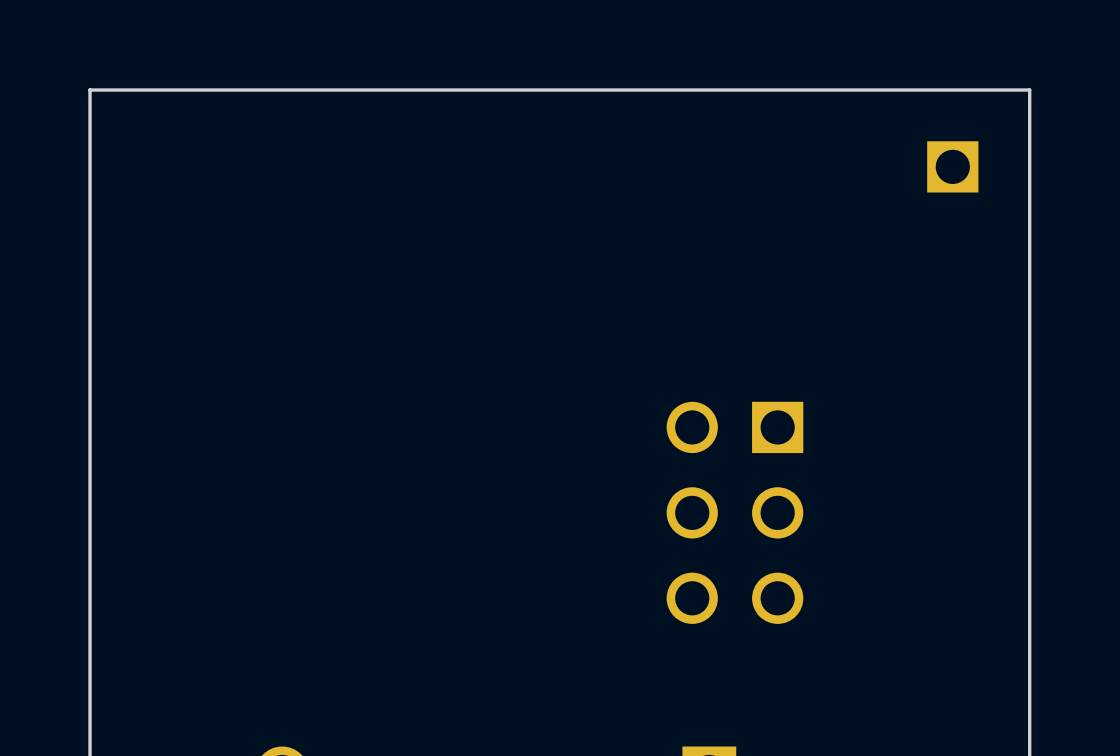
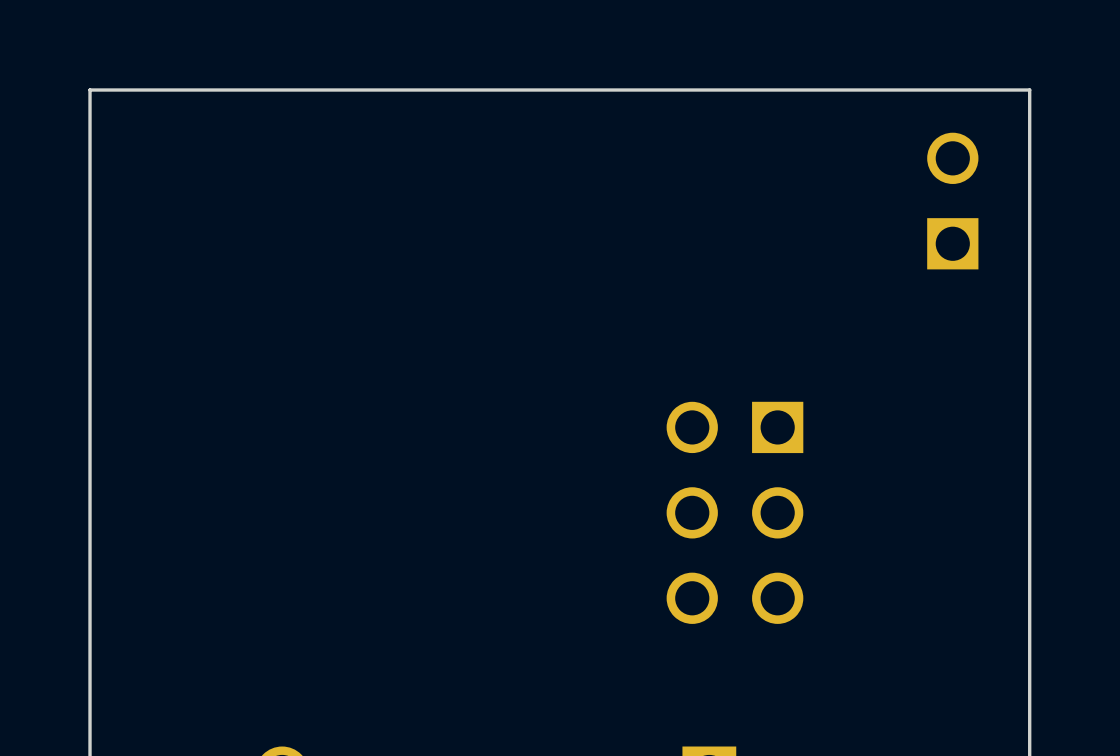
part: (952, 166) -> none
part: none -> (952, 201)

